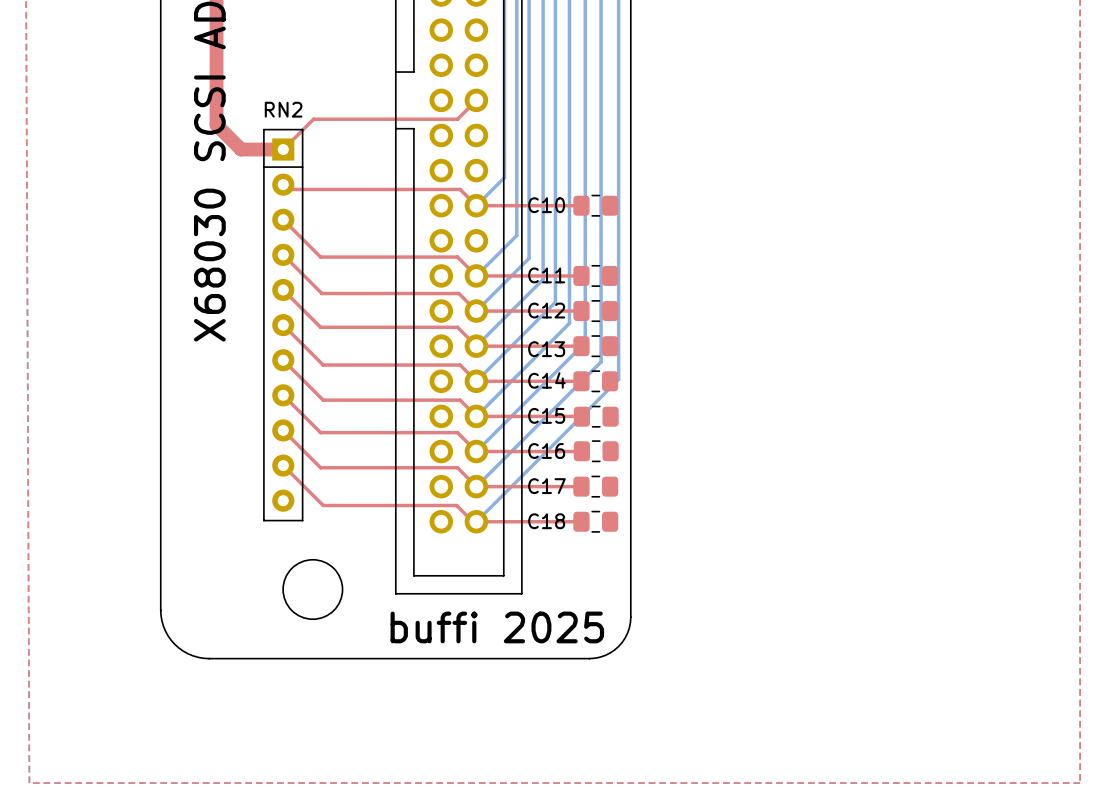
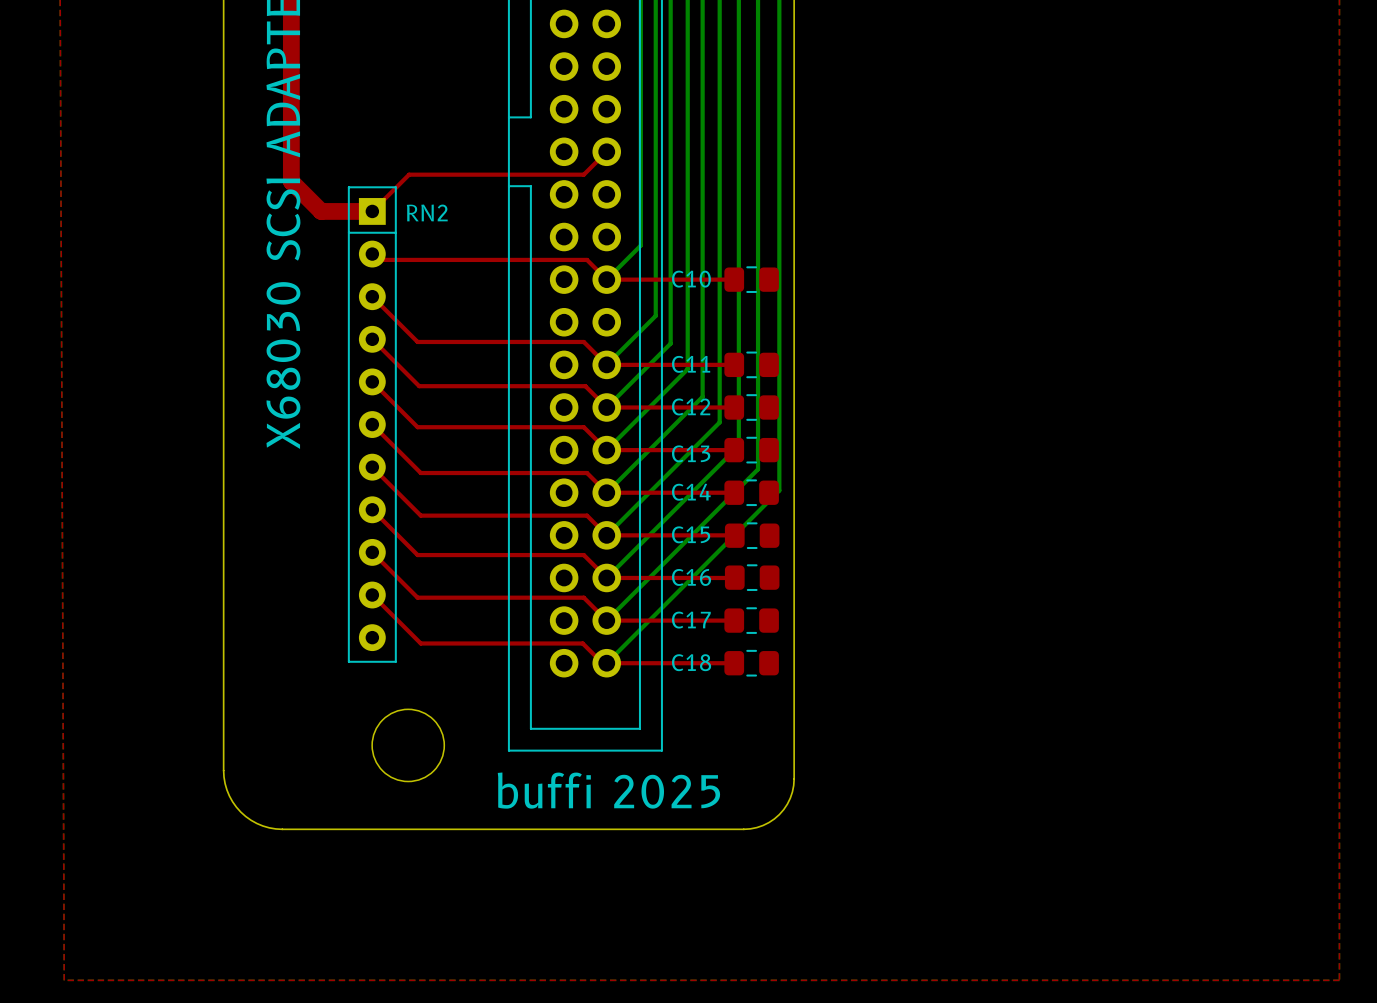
RN2 name position: RN2 (283, 109) -> RN2 (427, 212)

